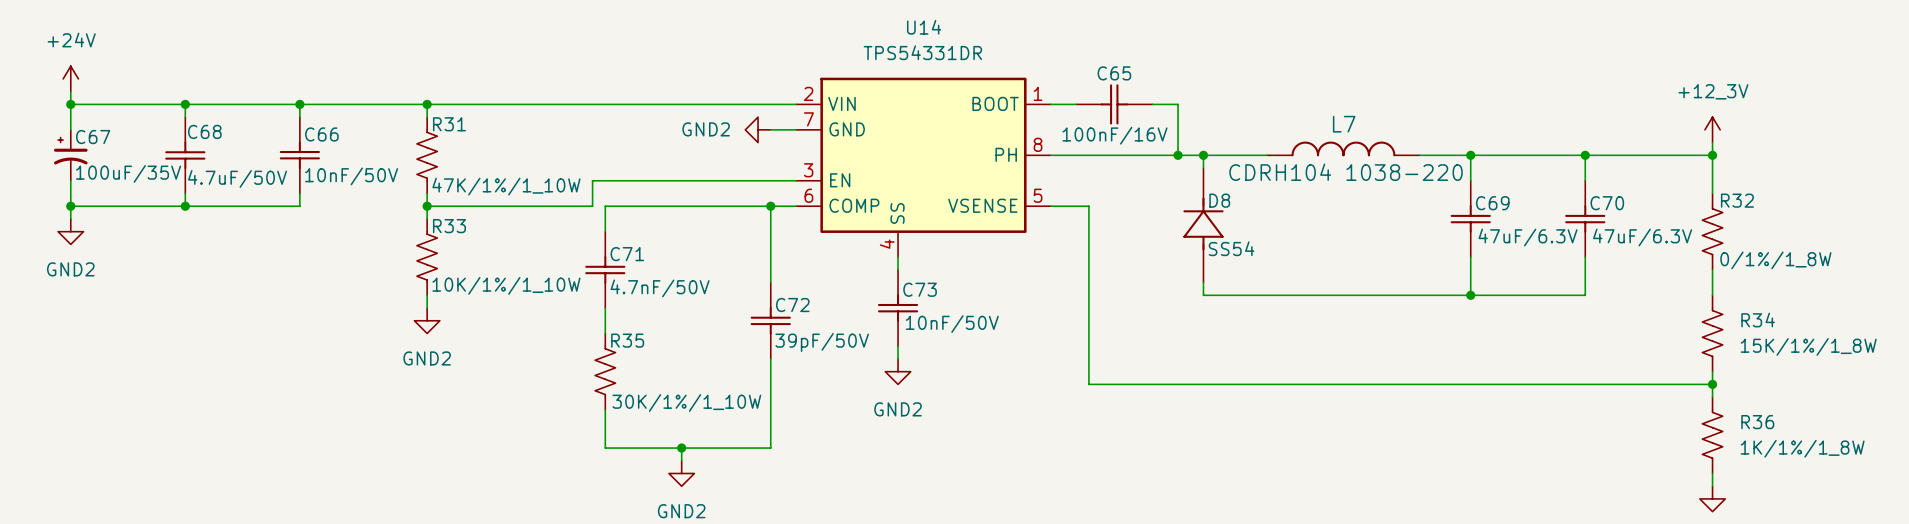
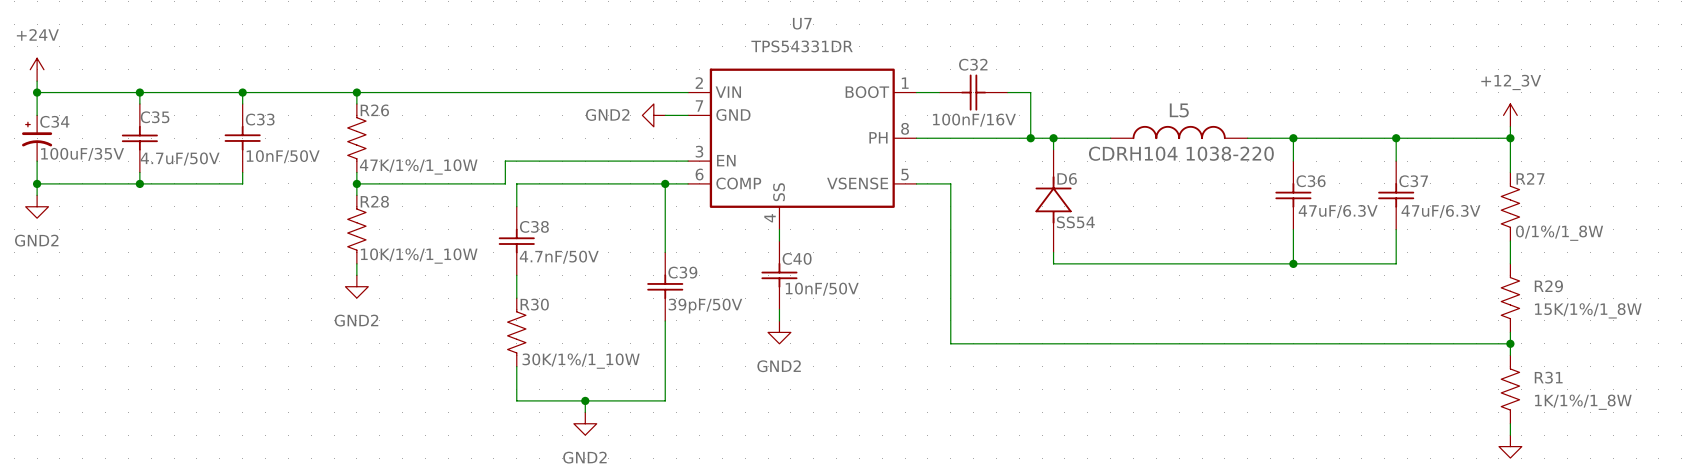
U14 name: U14 (924, 27) -> U7 (802, 23)
C65 name: C65 (1114, 73) -> C32 (973, 64)
R31 name: R31 (449, 124) -> R26 (374, 110)
L7 name: L7 (1344, 124) -> L5 (1179, 110)
C68 name: C68 (204, 131) -> C35 (155, 117)
C66 name: C66 (321, 134) -> C33 (260, 119)
C67 name: C67 (93, 137) -> C34 (54, 121)
D8 name: D8 (1219, 200) -> D6 (1067, 178)
R32 name: R32 (1737, 200) -> R27 (1530, 178)
C69 name: C69 (1492, 203) -> C36 (1311, 181)
C70 name: C70 (1607, 203) -> C37 (1413, 181)
R33 name: R33 (449, 226) -> R28 (374, 201)
C71 name: C71 (627, 254) -> C38 (534, 226)
C73 name: C73 (920, 289) -> C40 (797, 258)
C72 name: C72 (792, 305) -> C39 (682, 272)
R34 name: R34 (1758, 319) -> R29 (1548, 286)
R35 name: R35 (627, 340) -> R30 (534, 304)
R36 name: R36 (1757, 422) -> R31 (1548, 377)

